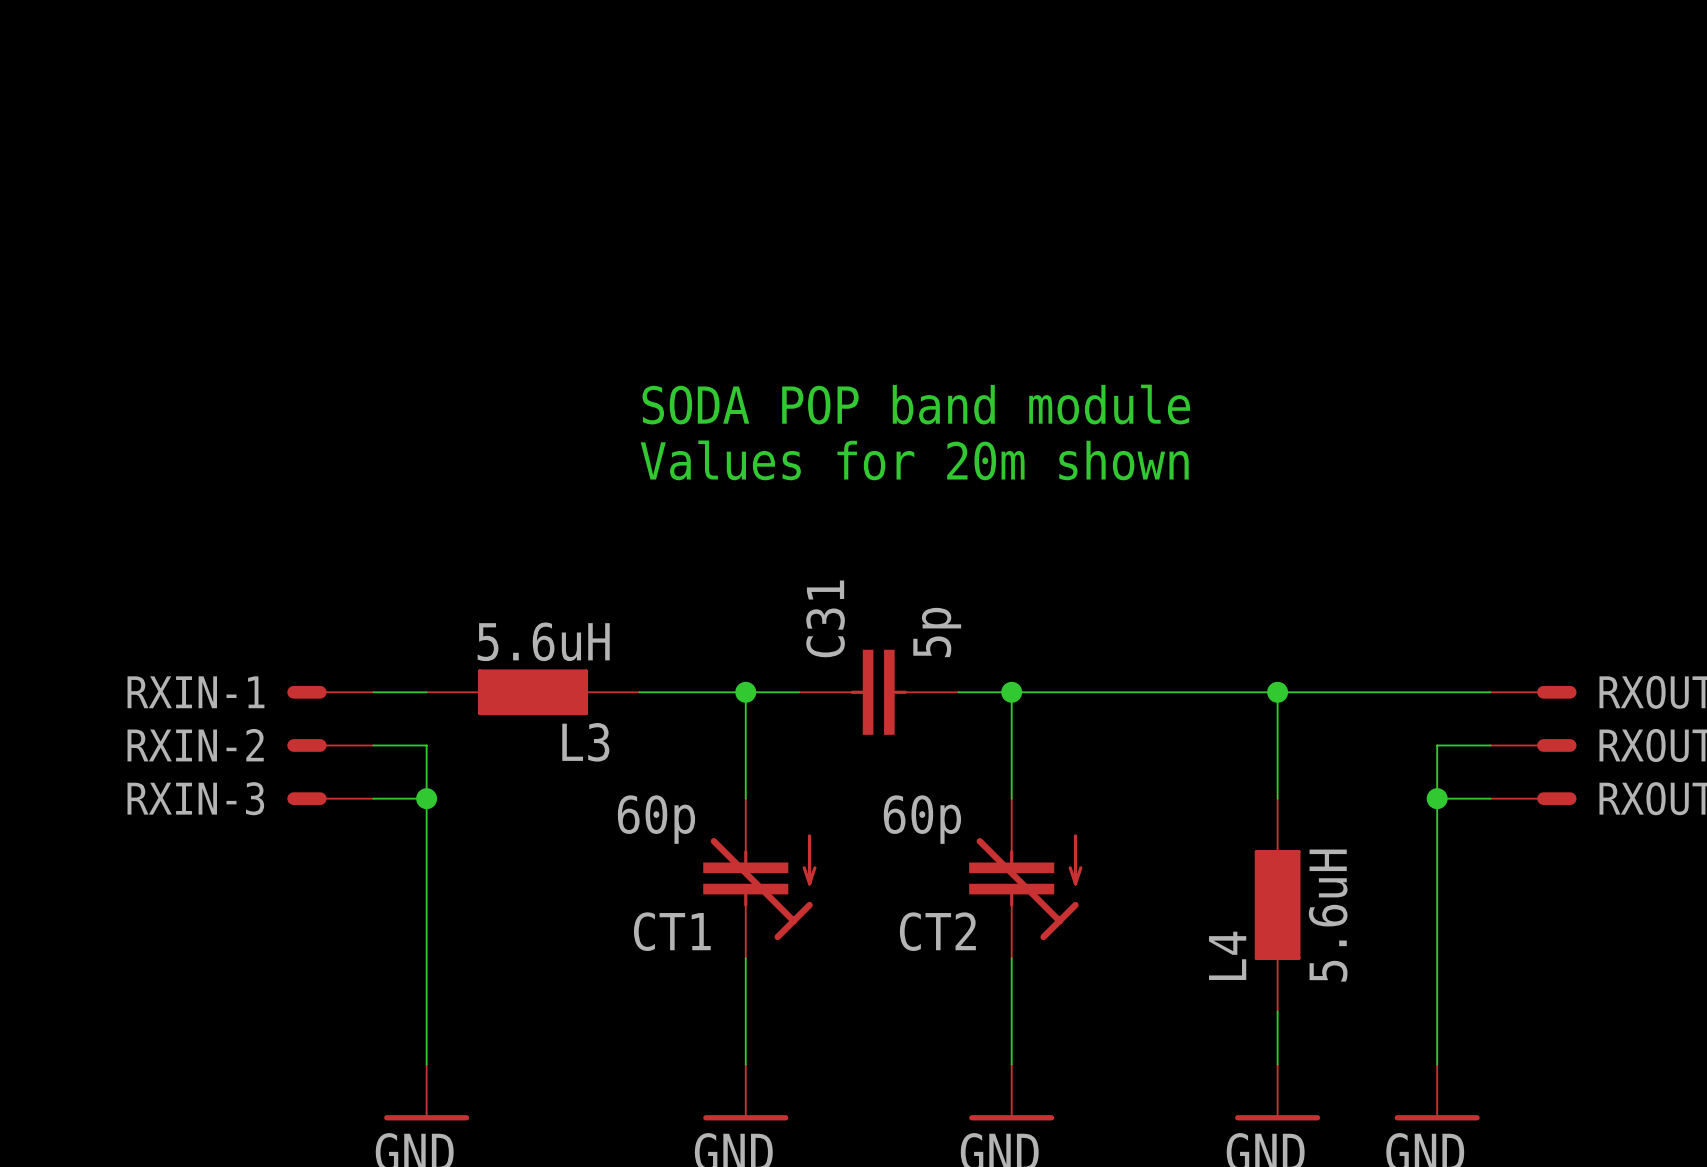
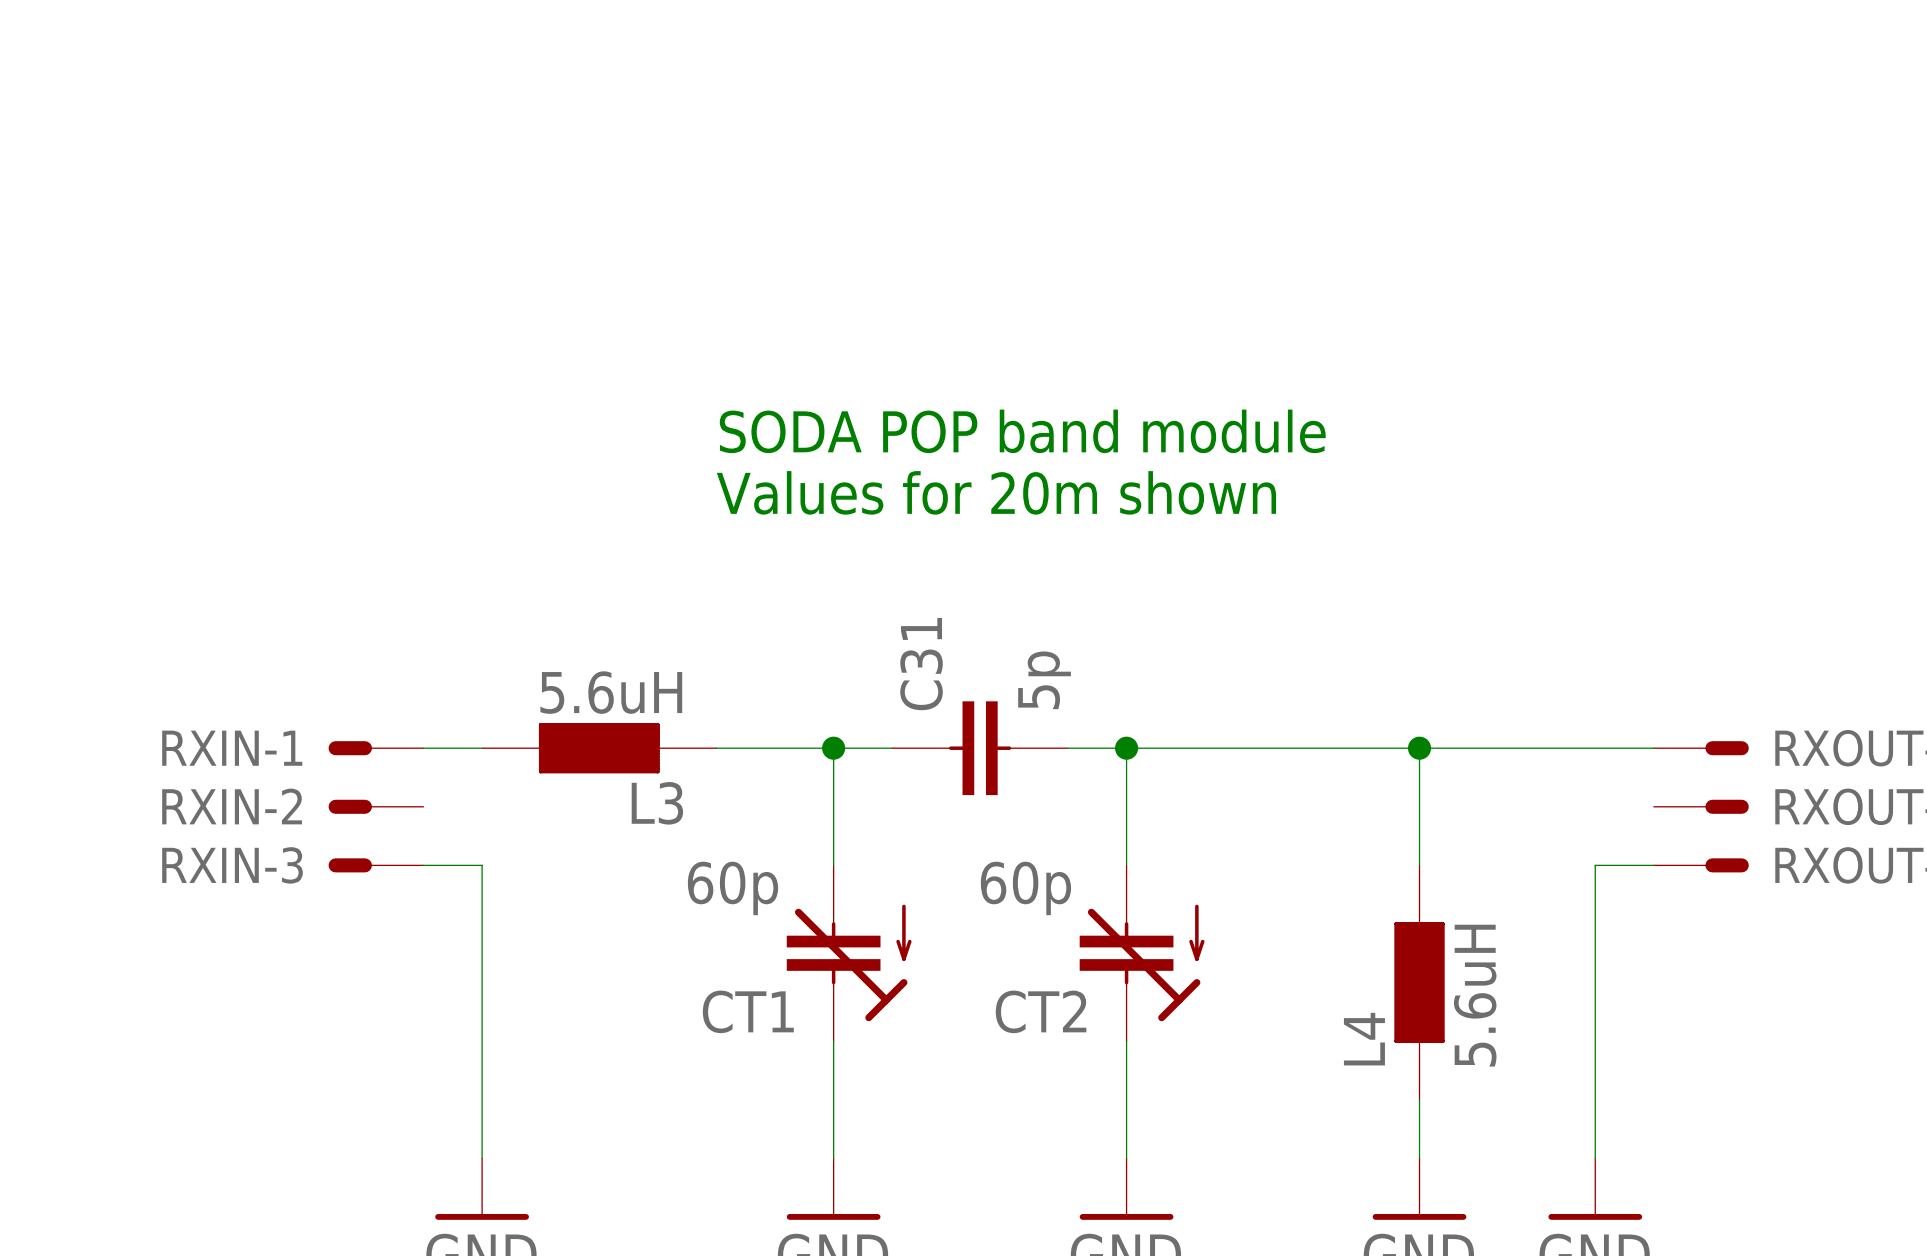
wire: (373, 745) (426, 745) (426, 798) -> none
wire: (1490, 745) (1437, 745) (1437, 798) -> none
junction: (426, 798) -> none
junction: (1437, 798) -> none

